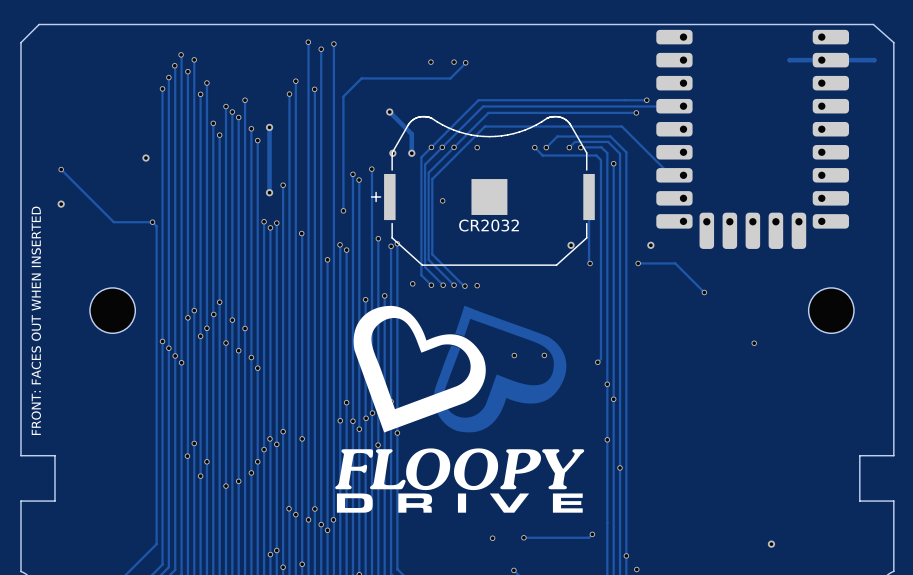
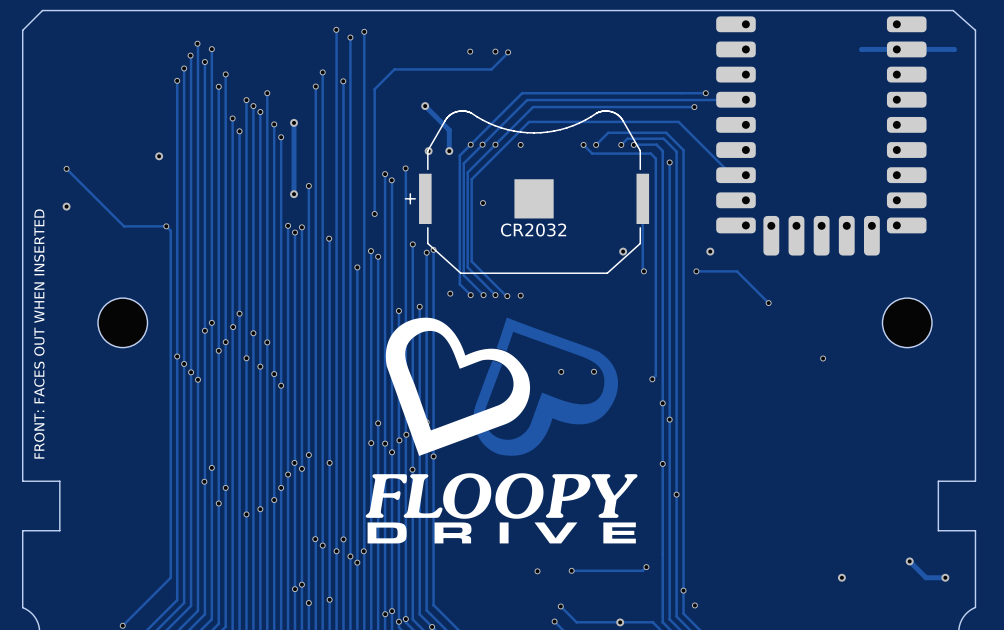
track: none -> (909, 561) (926, 577) (945, 577)
via: none -> (909, 561)
via: none -> (945, 577)

